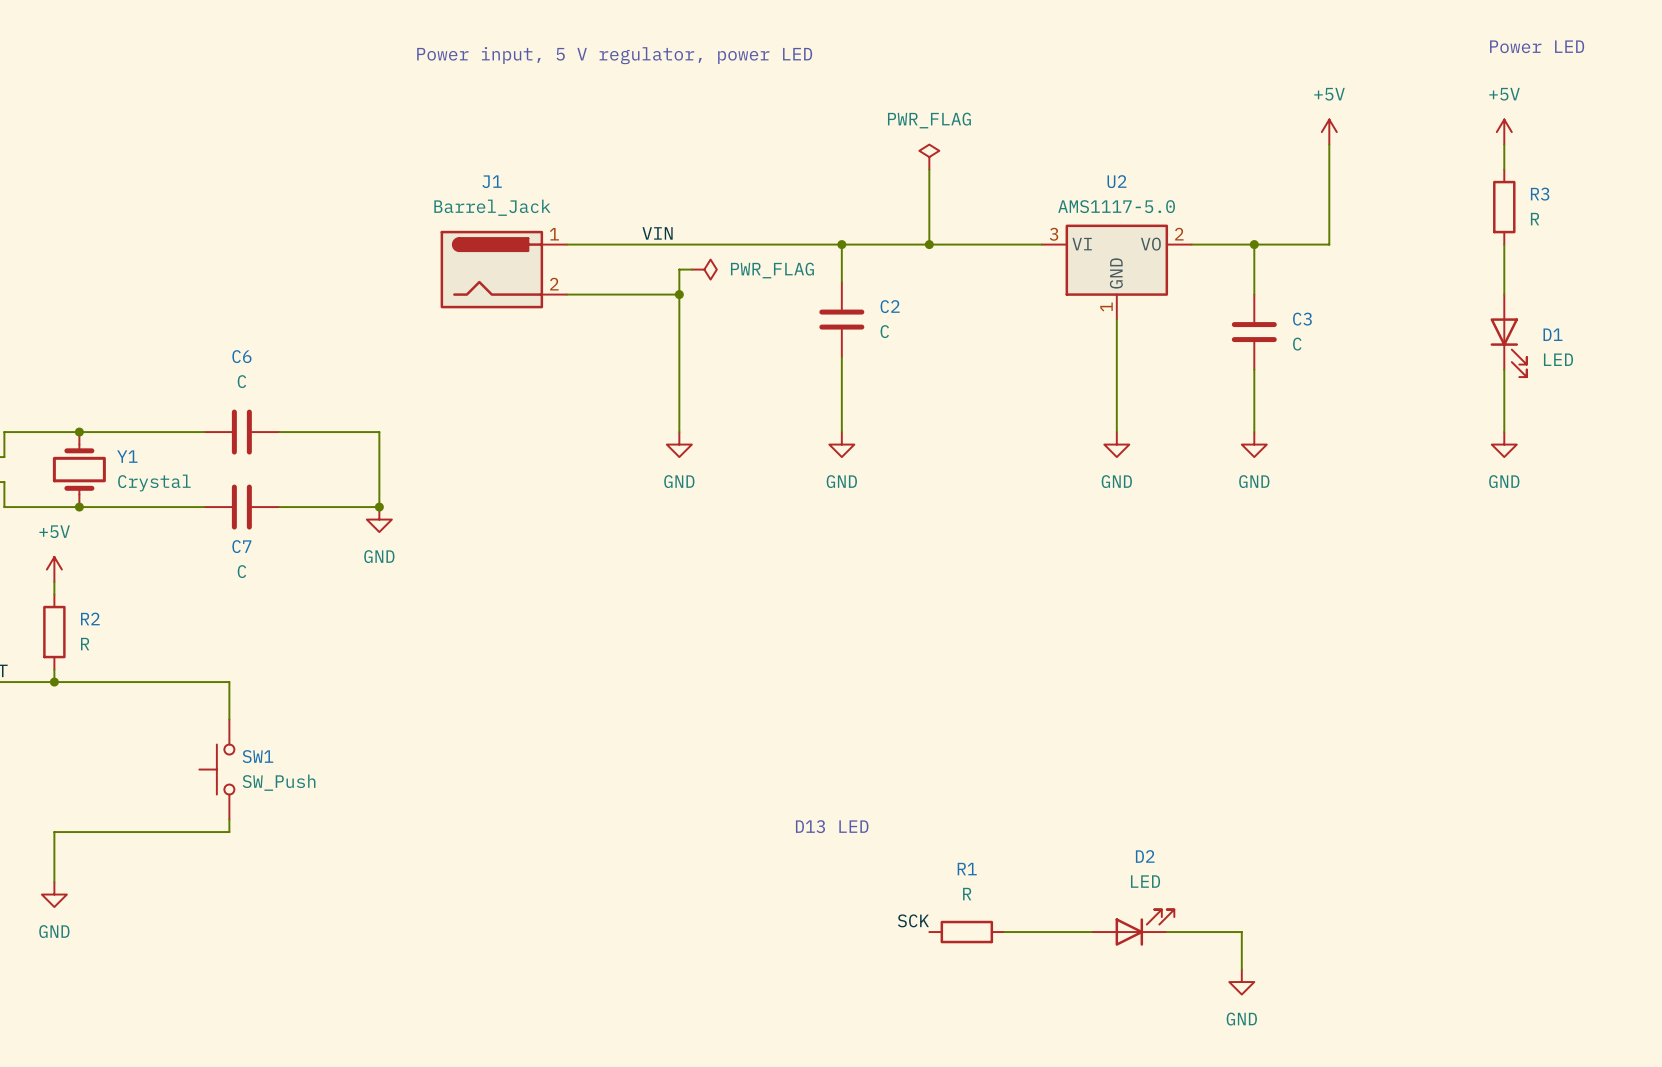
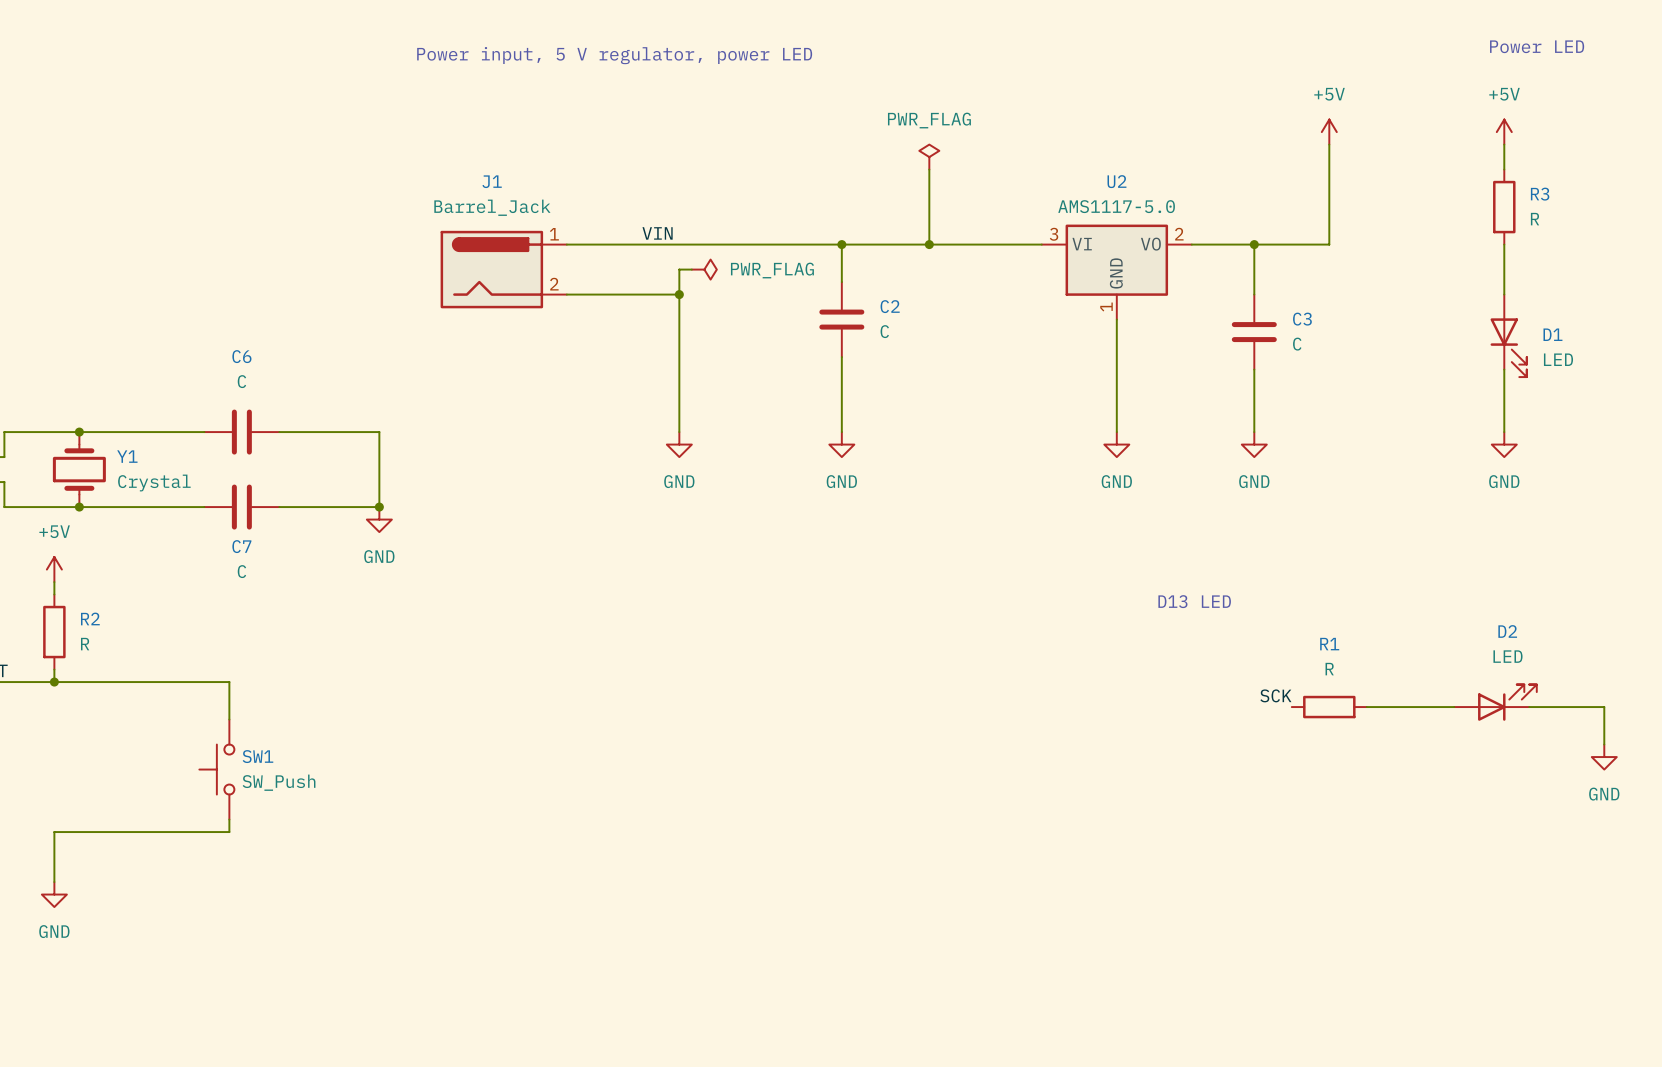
text: none -> D13 LED (1194, 601)
label: none -> SCK (1275, 695)
wire: none -> (1366, 707) (1454, 707)
wire: none -> (1529, 707) (1604, 707) (1604, 744)
power symbol: none -> GND (1604, 757)
text: D13 LED (832, 826) -> none
label: SCK (913, 920) -> none
D2 position: (1133, 927) -> (1495, 702)
R1 position: (966, 932) -> (1329, 707)
wire: (1004, 932) (1091, 932) -> none
wire: (1166, 932) (1241, 932) (1241, 969) -> none
power symbol: GND (1241, 982) -> none

